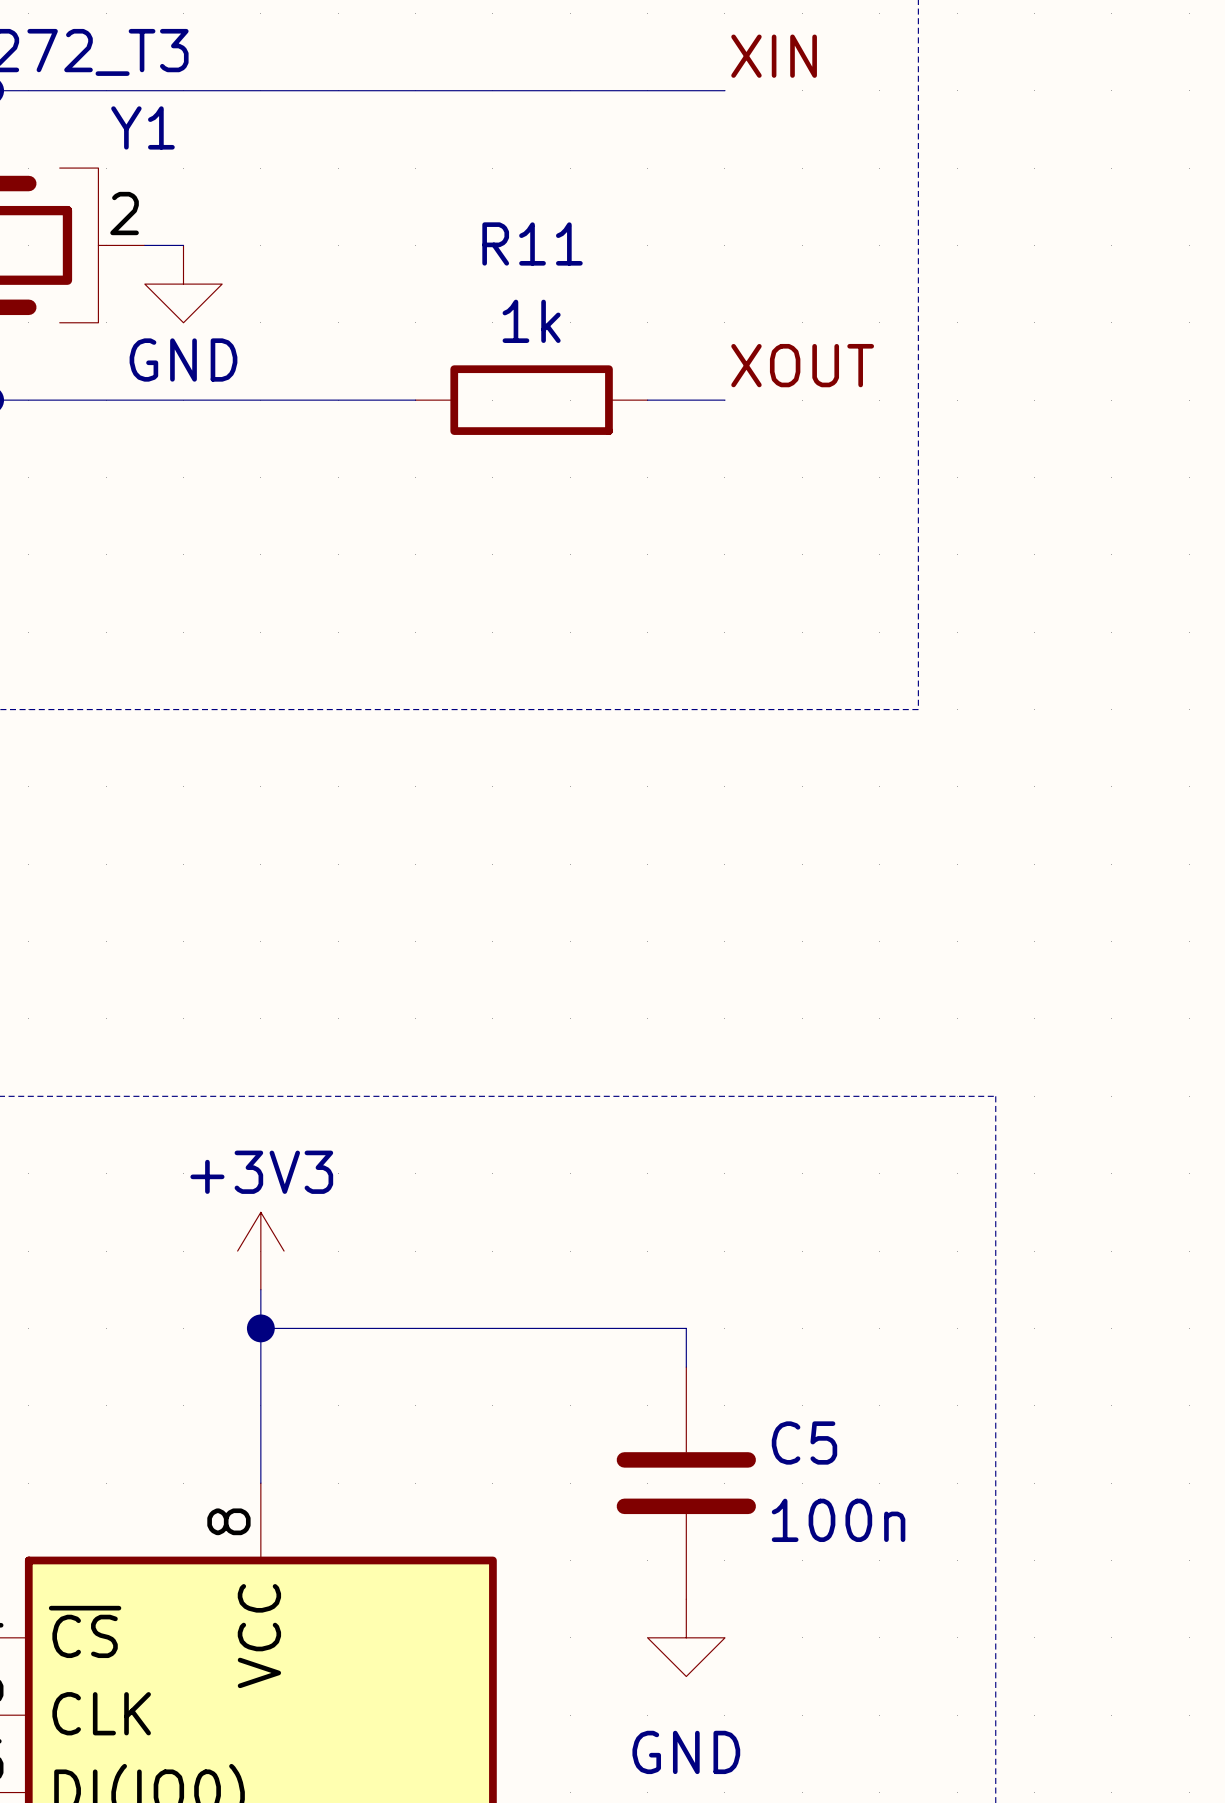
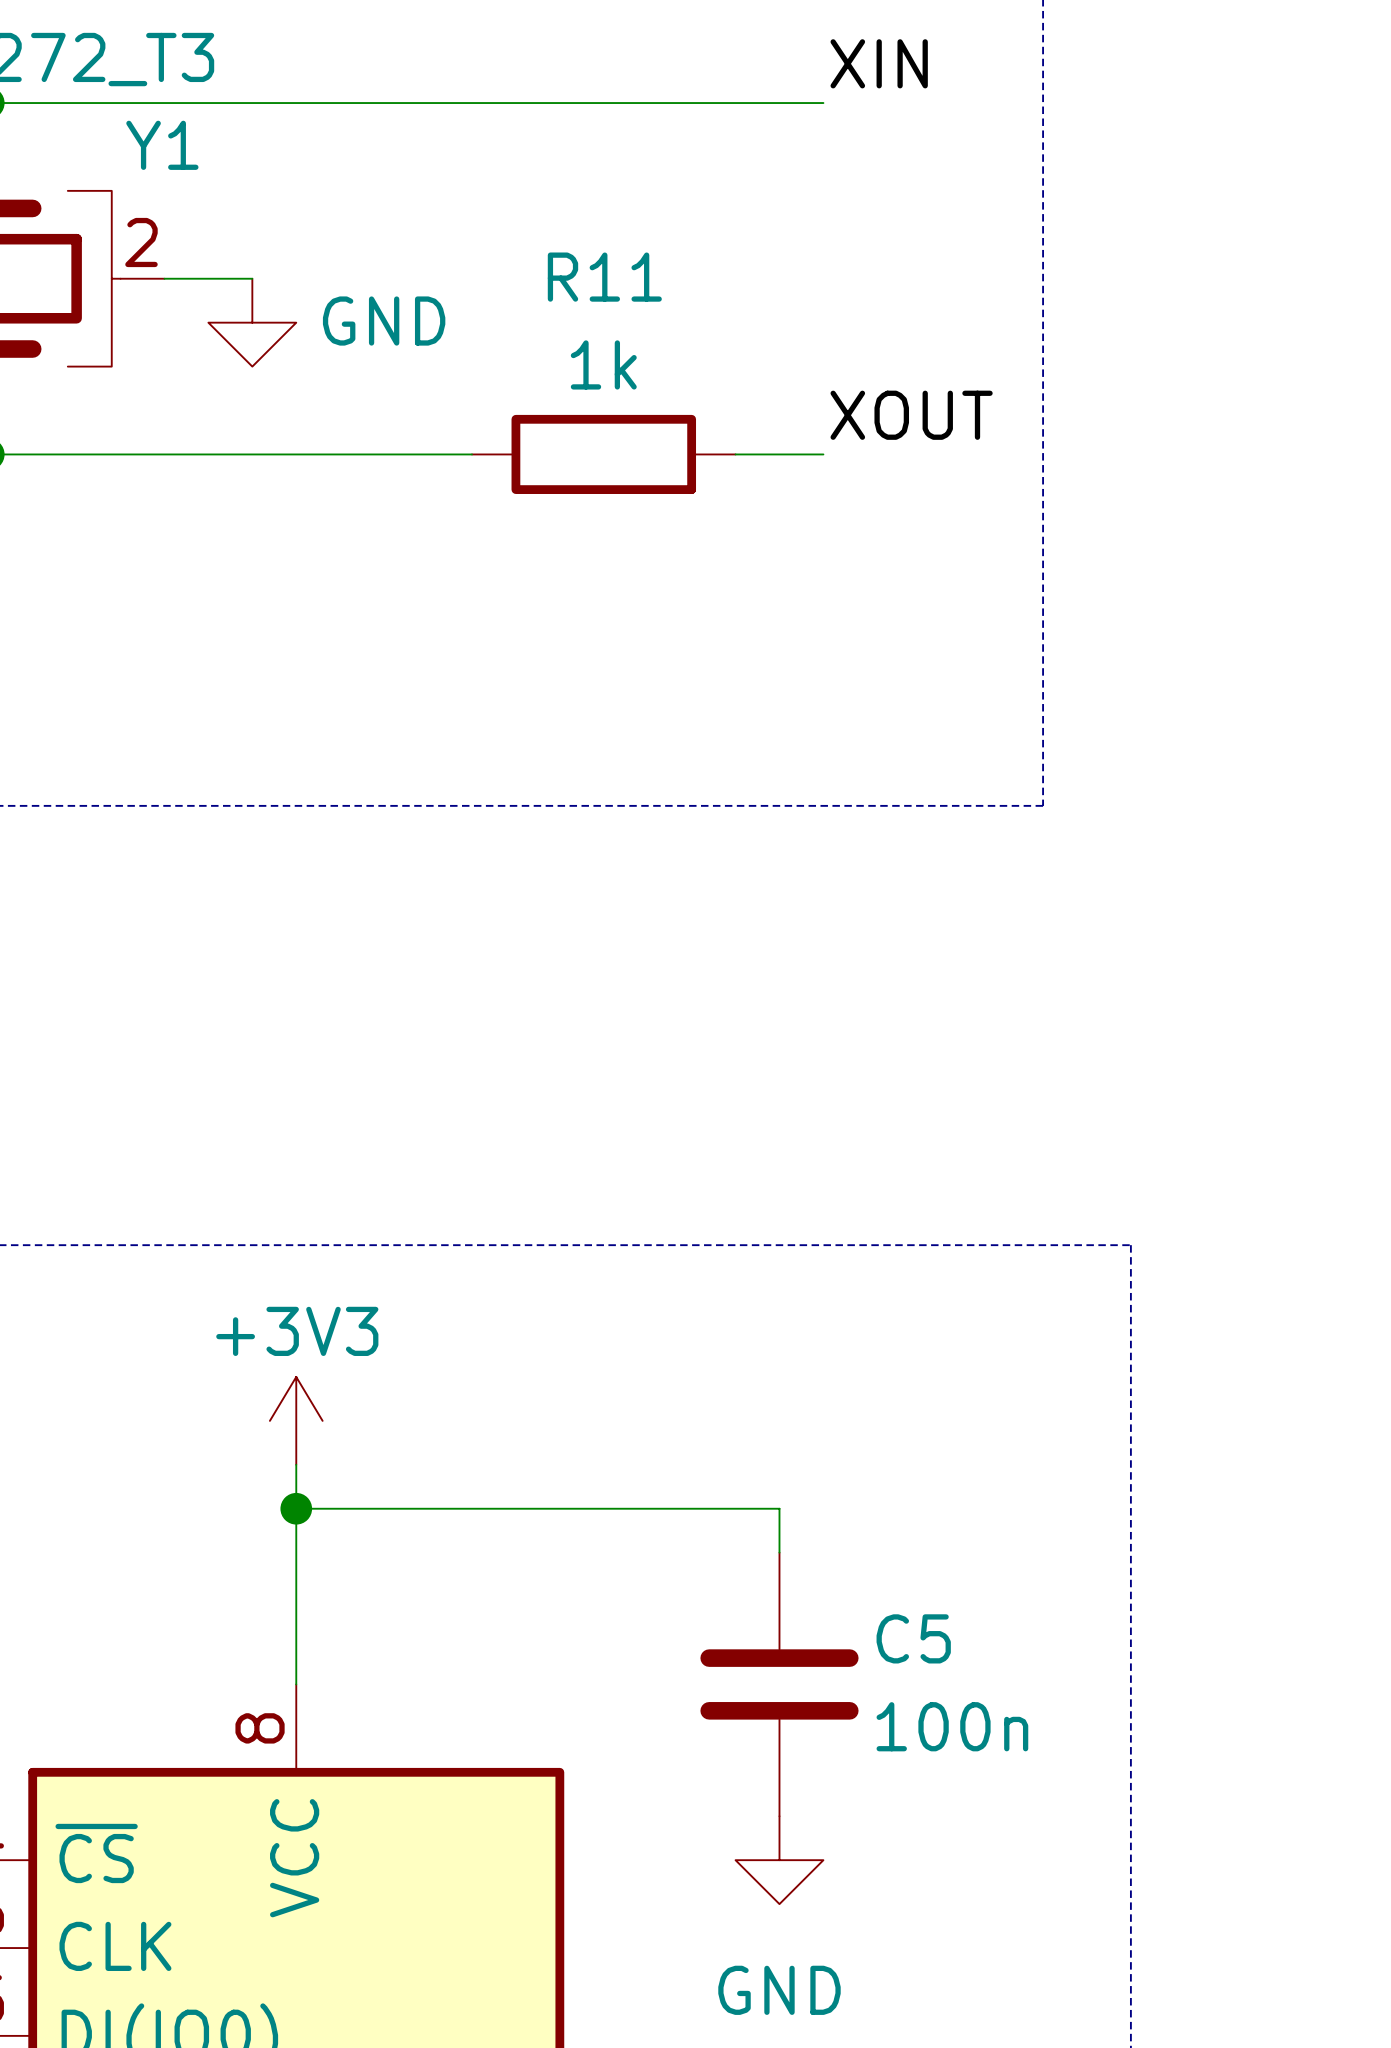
wire: none -> (208, 278) (252, 278)
power symbol position: GND (183, 284) -> GND (252, 322)
power symbol text position: GND (183, 360) -> GND (384, 321)

